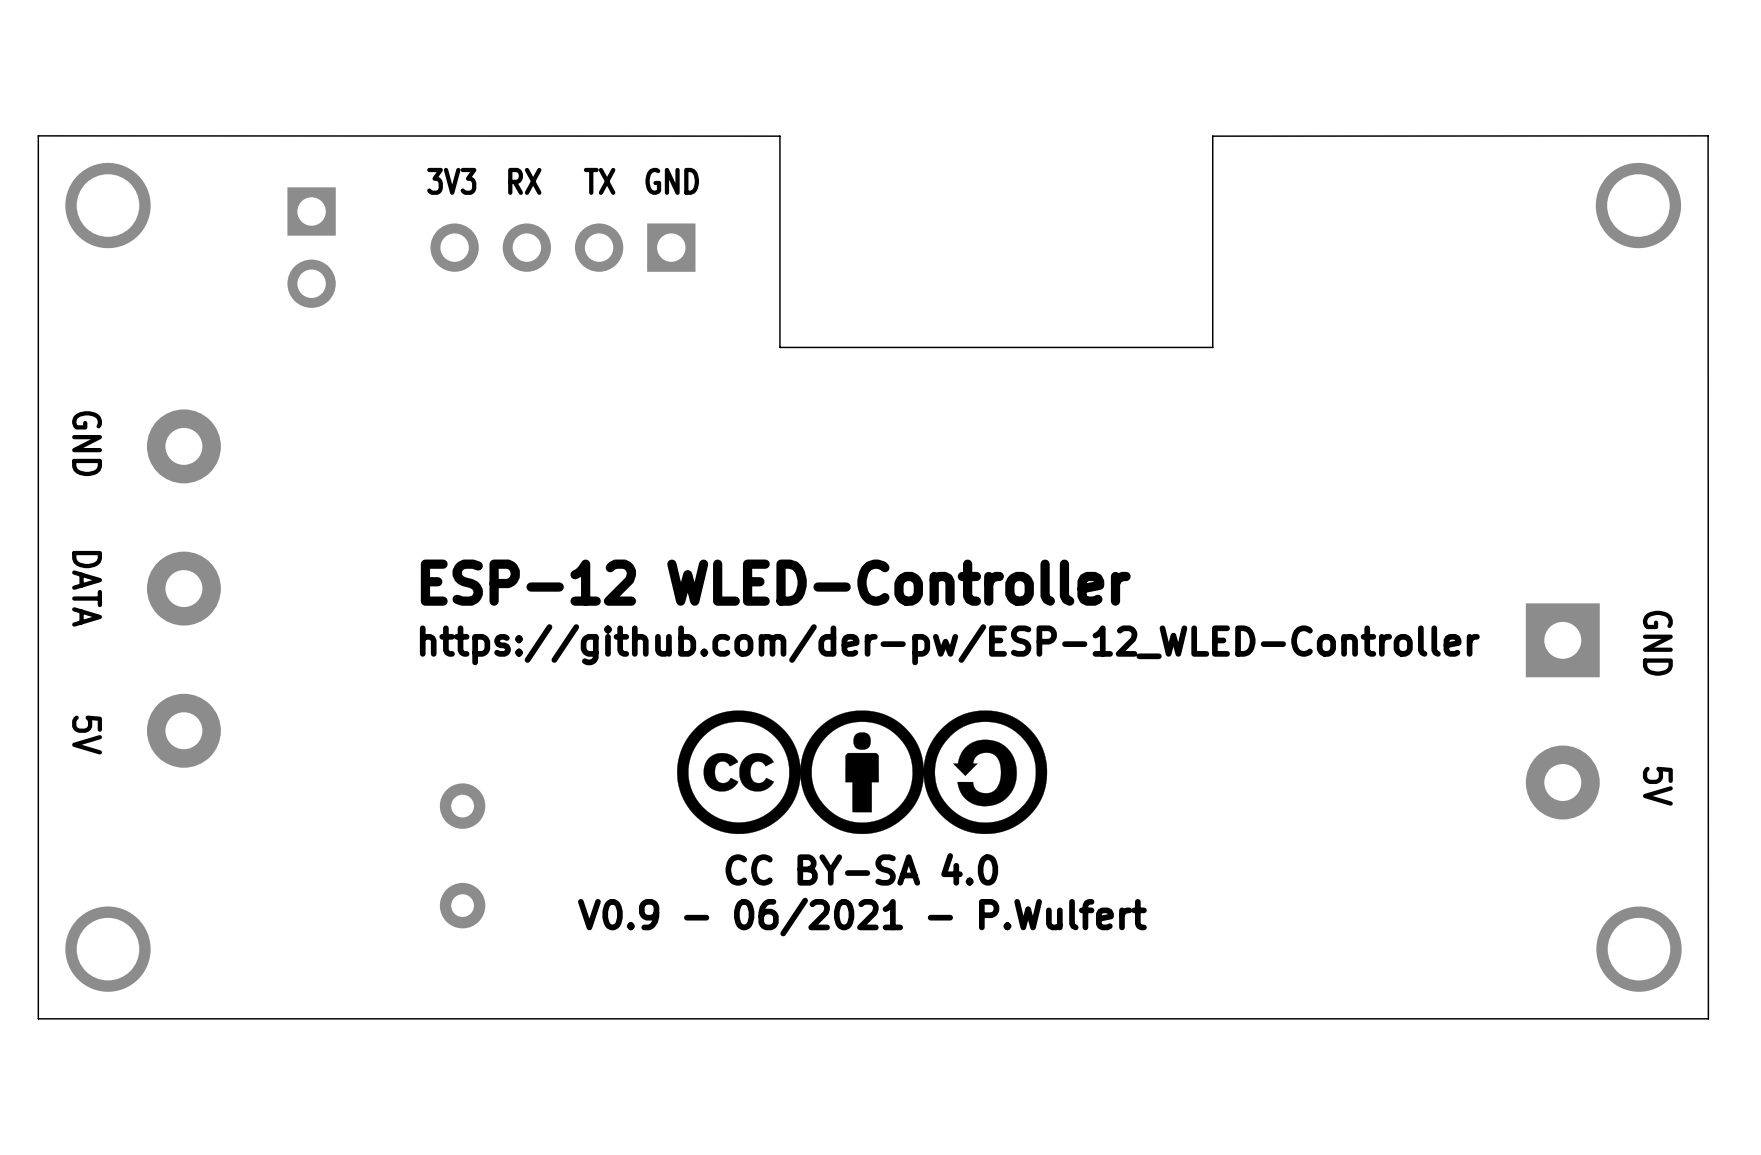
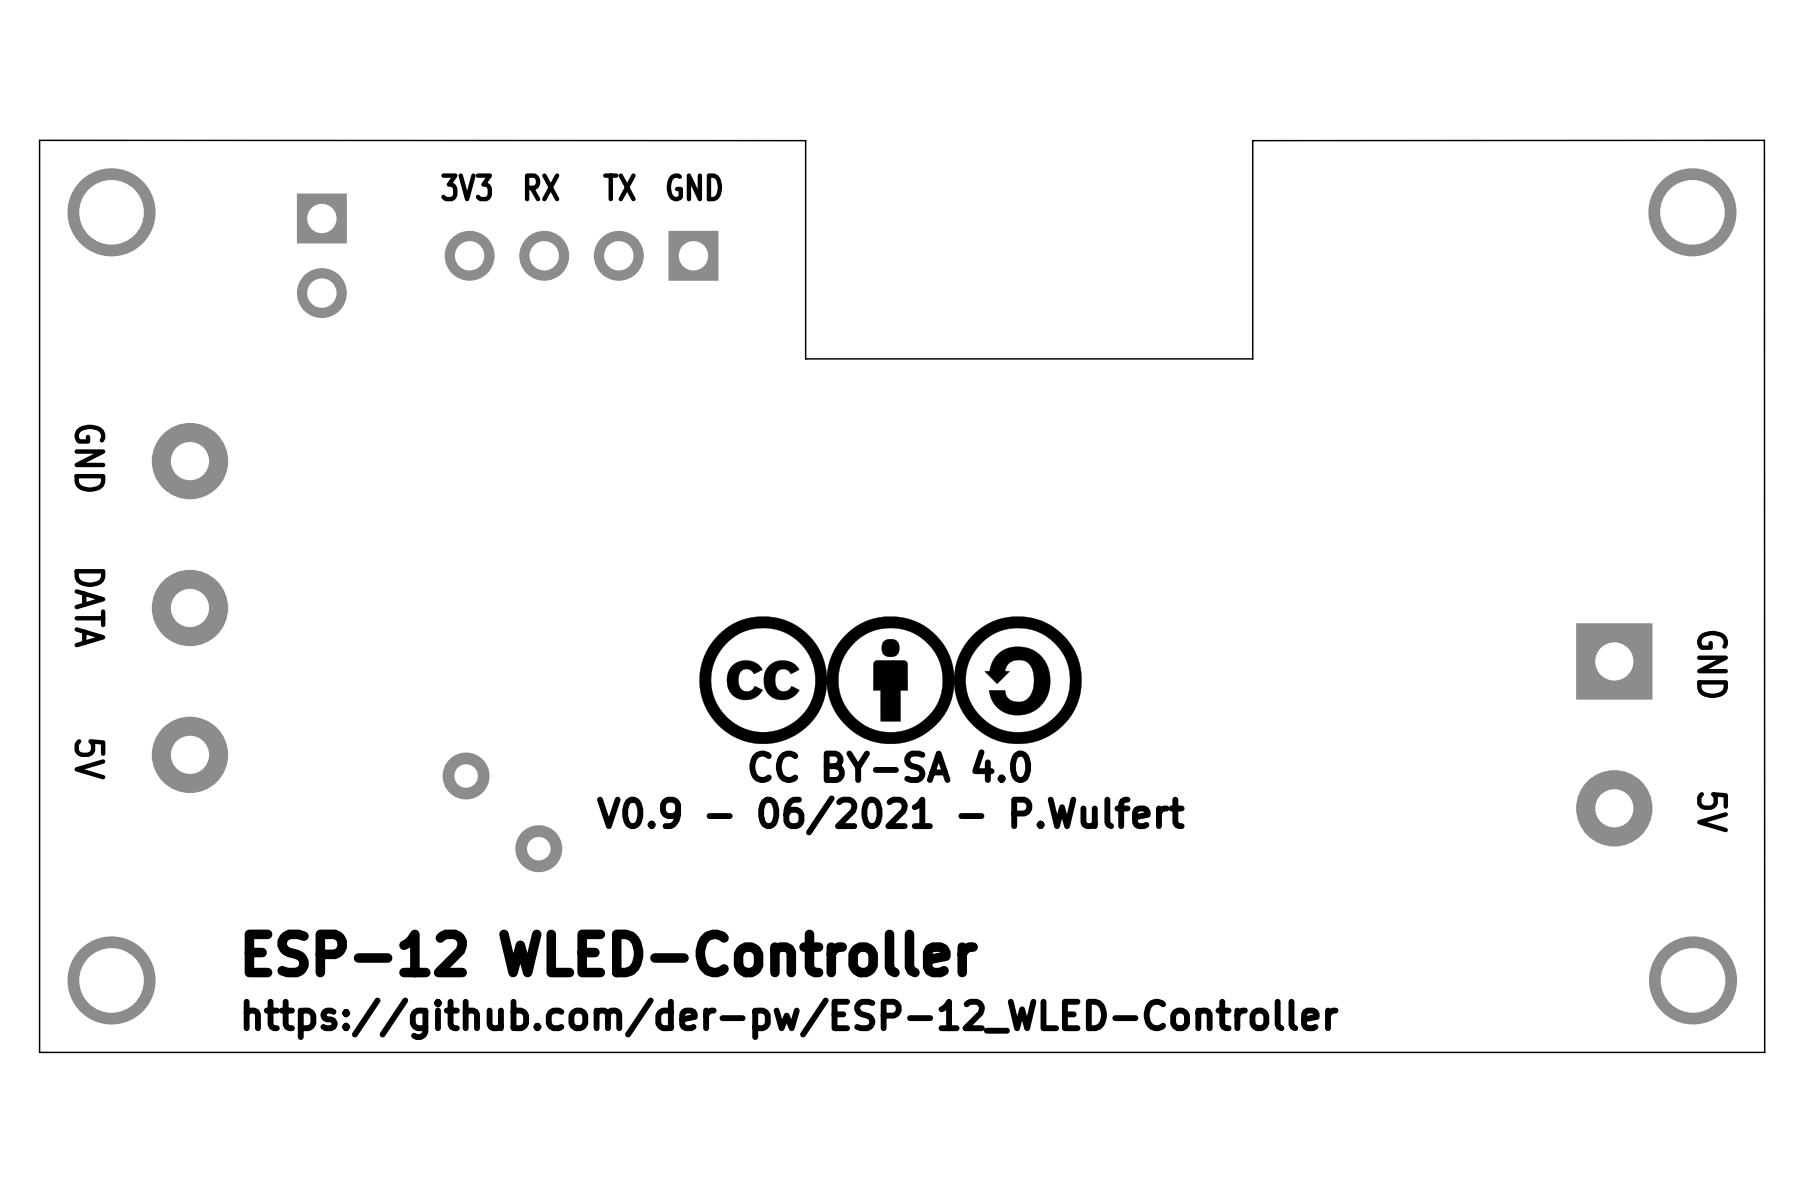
text position: ESP-12 WLED-Controller (775, 582) -> ESP-12 WLED-Controller (611, 953)
text position: https://github.com/der-pw/ESP-12_WLED-Controller (949, 644) -> https://github.com/der-pw/ESP-12_WLED-Controller (791, 1018)
drawing position: (862, 772) -> (890, 680)
part: none -> (502, 812)
part: (462, 855) -> none
text position: CC BY-SA 4.0 (861, 869) -> CC BY-SA 4.0 (890, 766)
text position: V0.9 - 06/2021 - P.Wulfert (862, 917) -> V0.9 - 06/2021 - P.Wulfert (890, 815)

